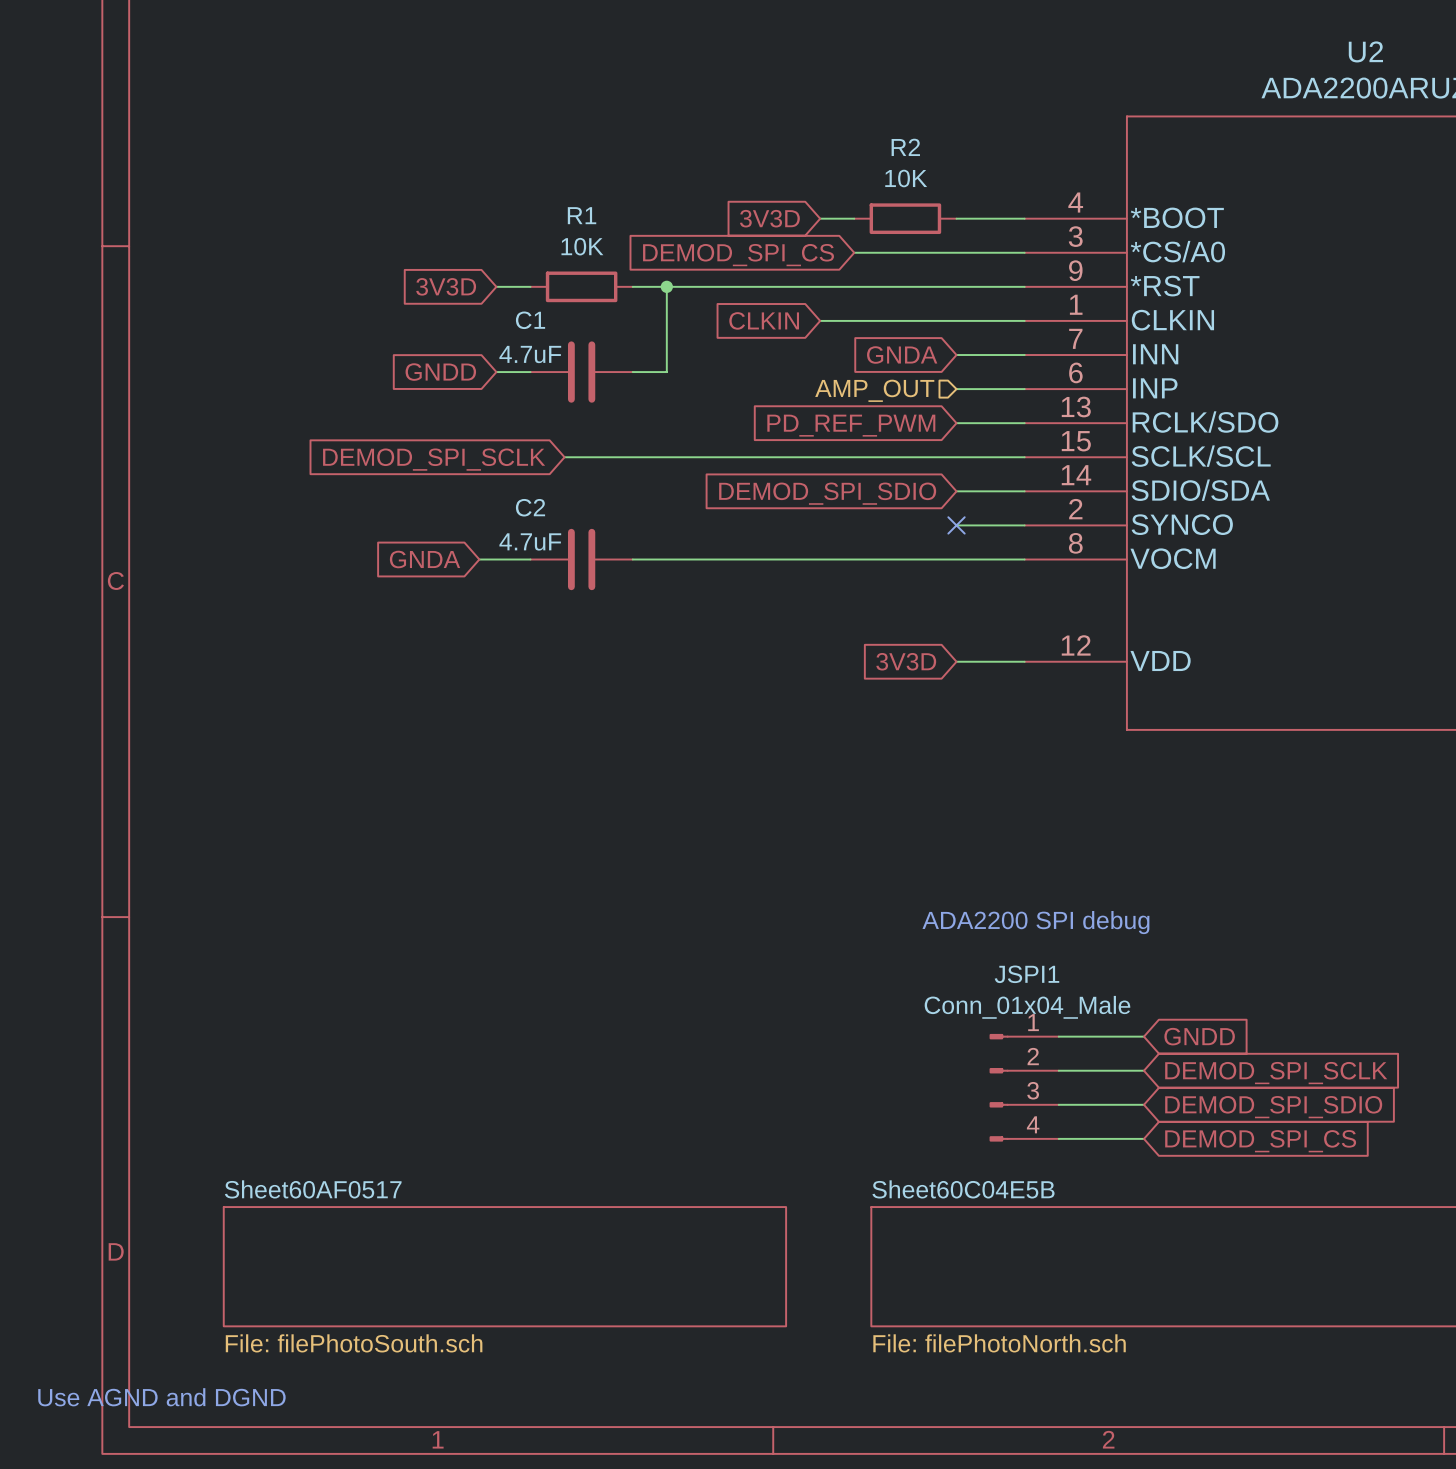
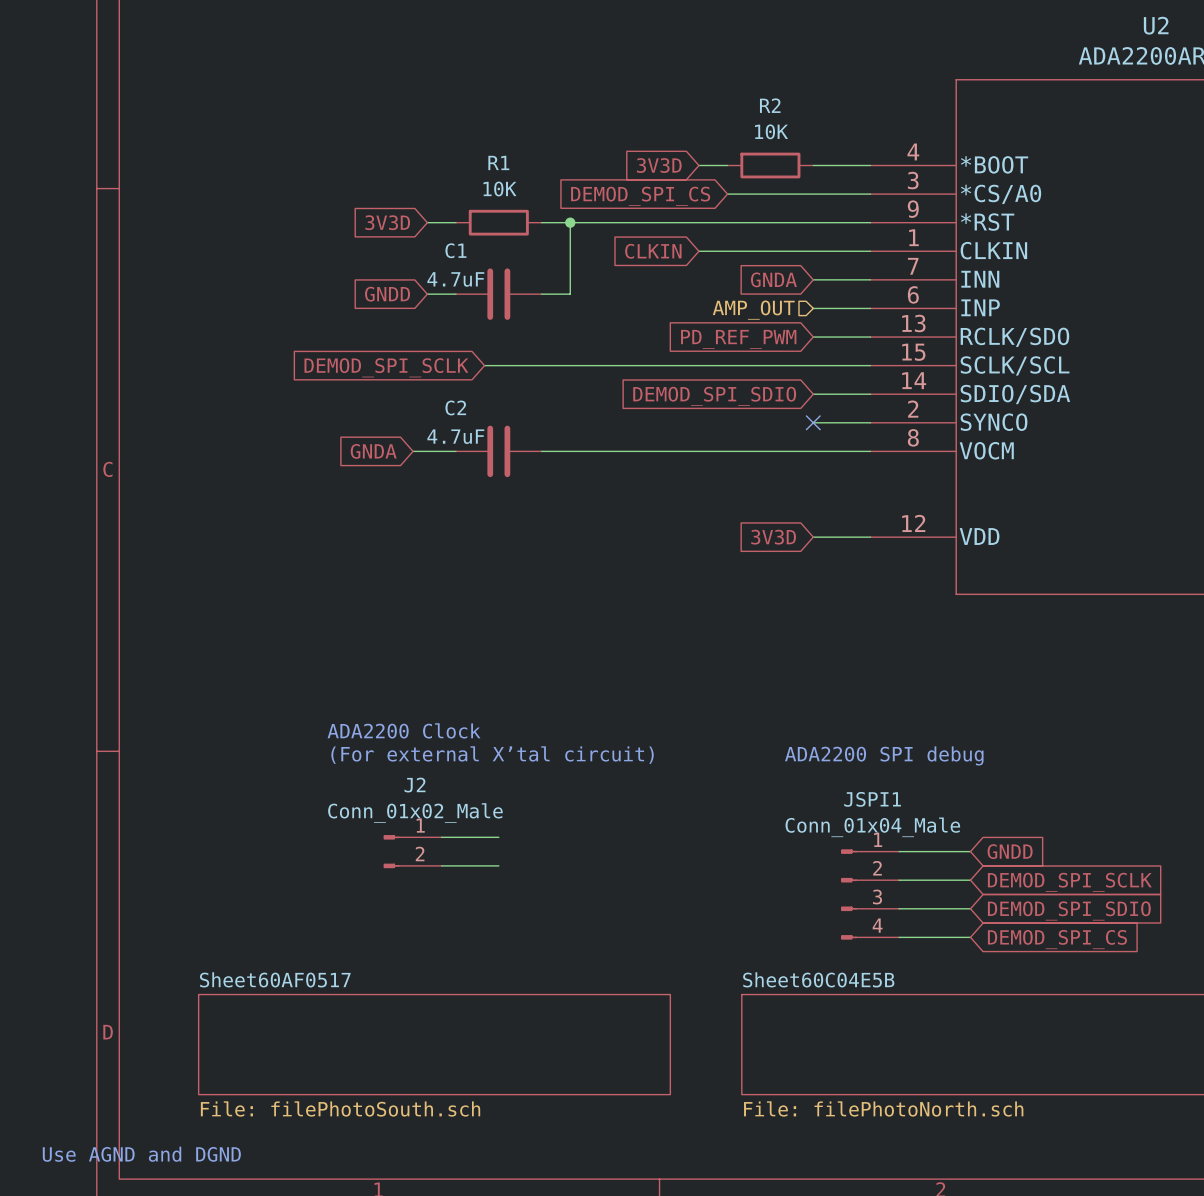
text: none -> ADA2200 Clock (404, 730)
text: none -> (For external X’tal circuit) (492, 755)
wire: none -> (441, 837) (498, 837)
J2: none -> Conn_01x02_Male (412, 851)
wire: none -> (441, 865) (498, 865)

